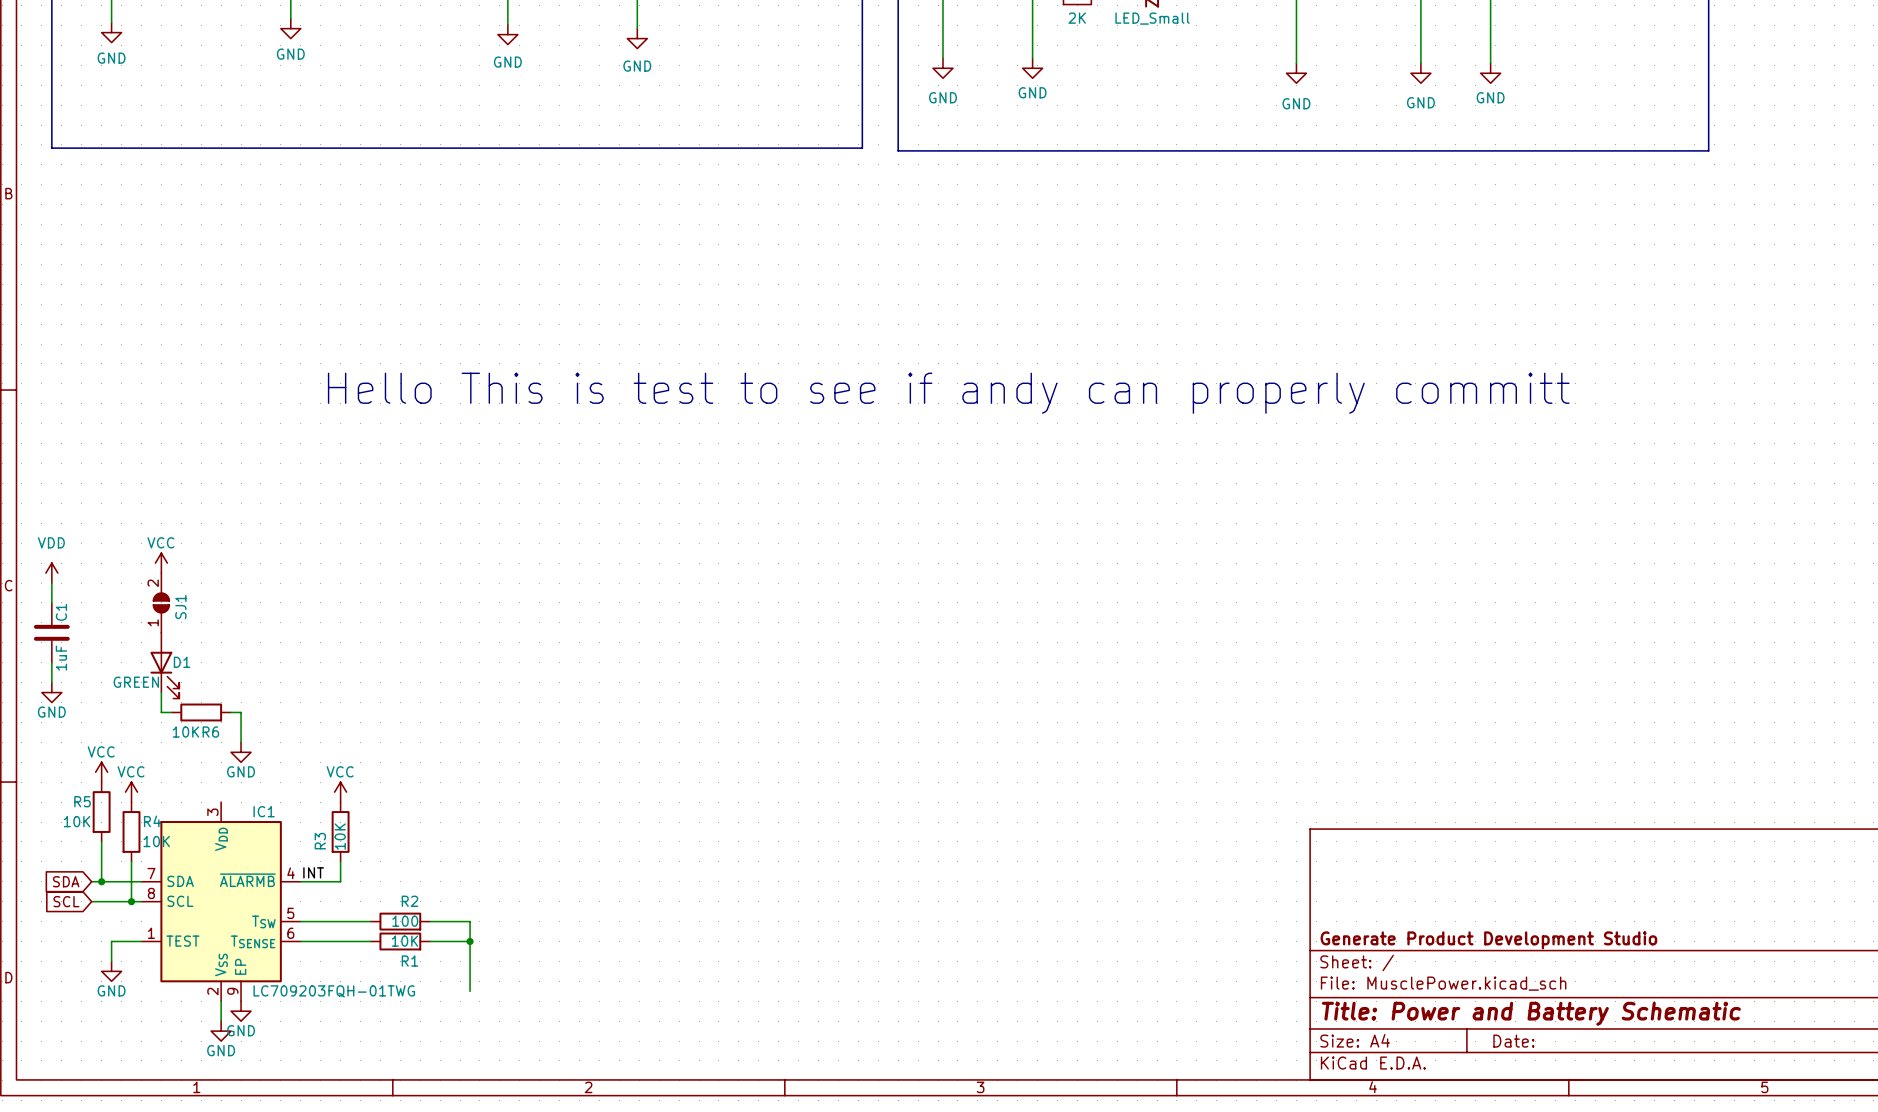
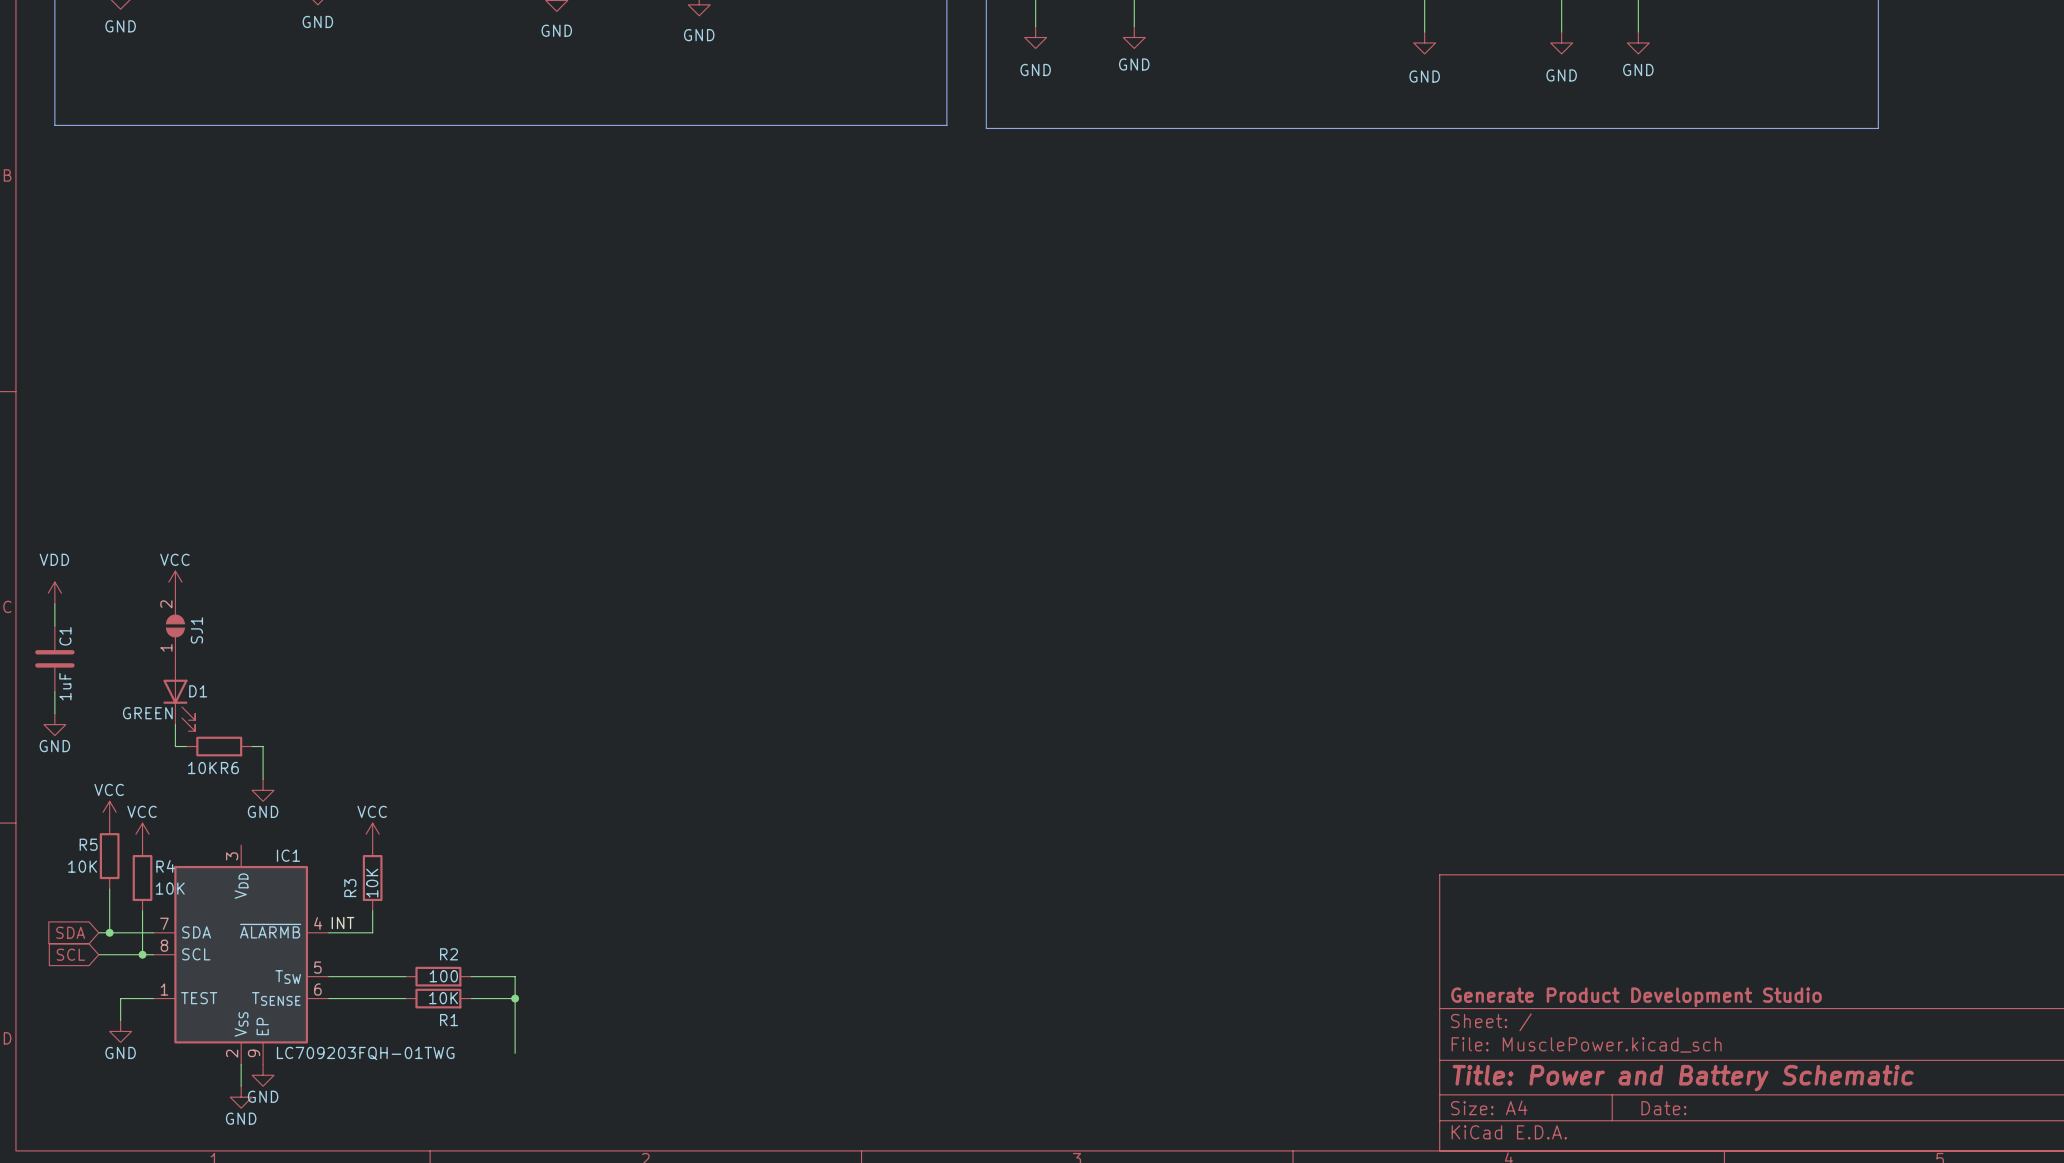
text: Hello This is test to see if andy can properly committ (948, 393) -> none

